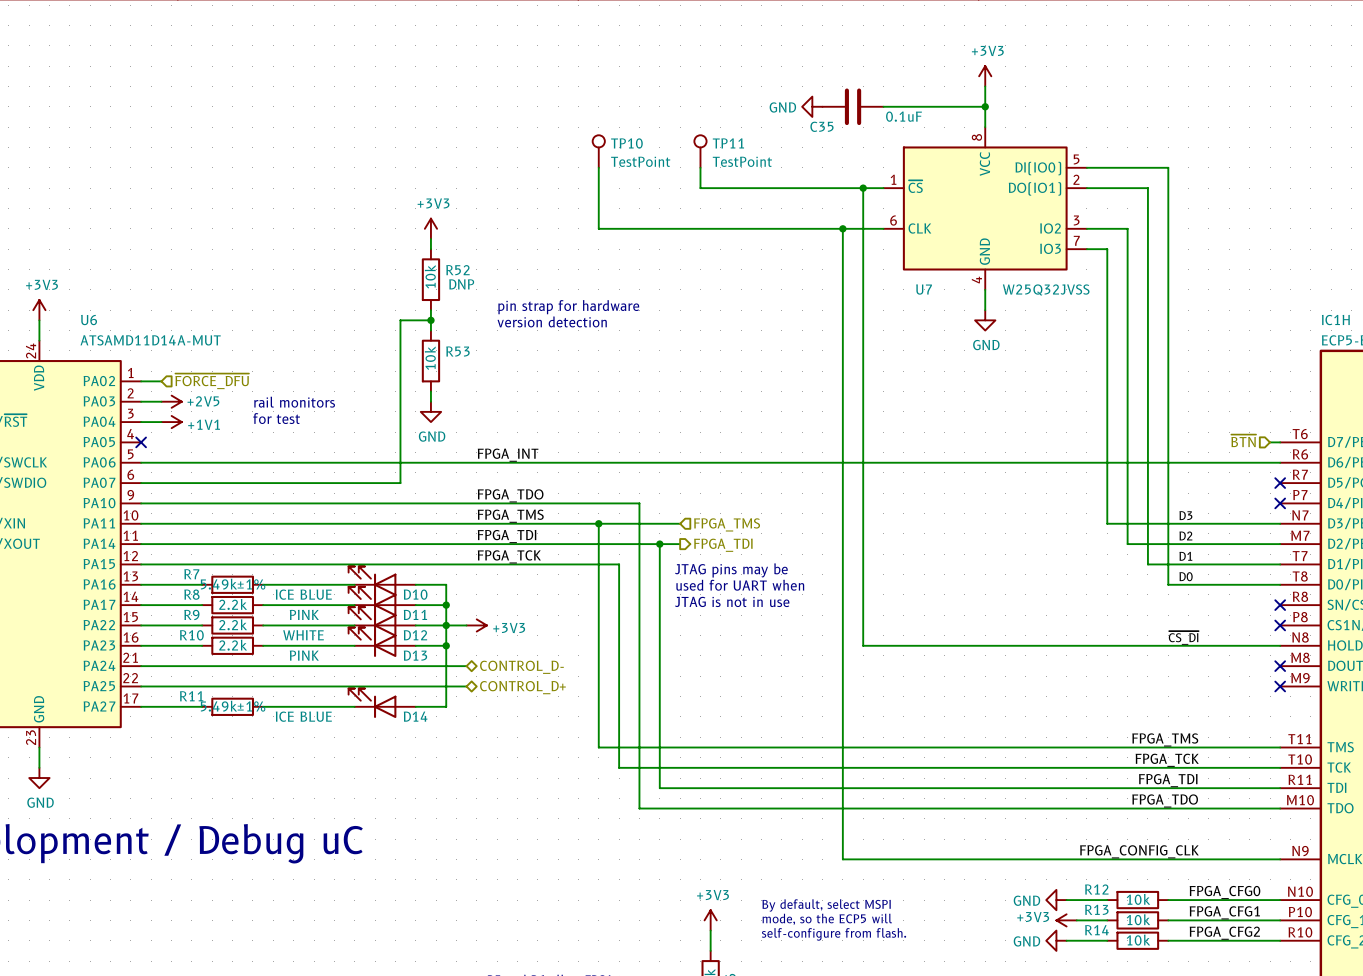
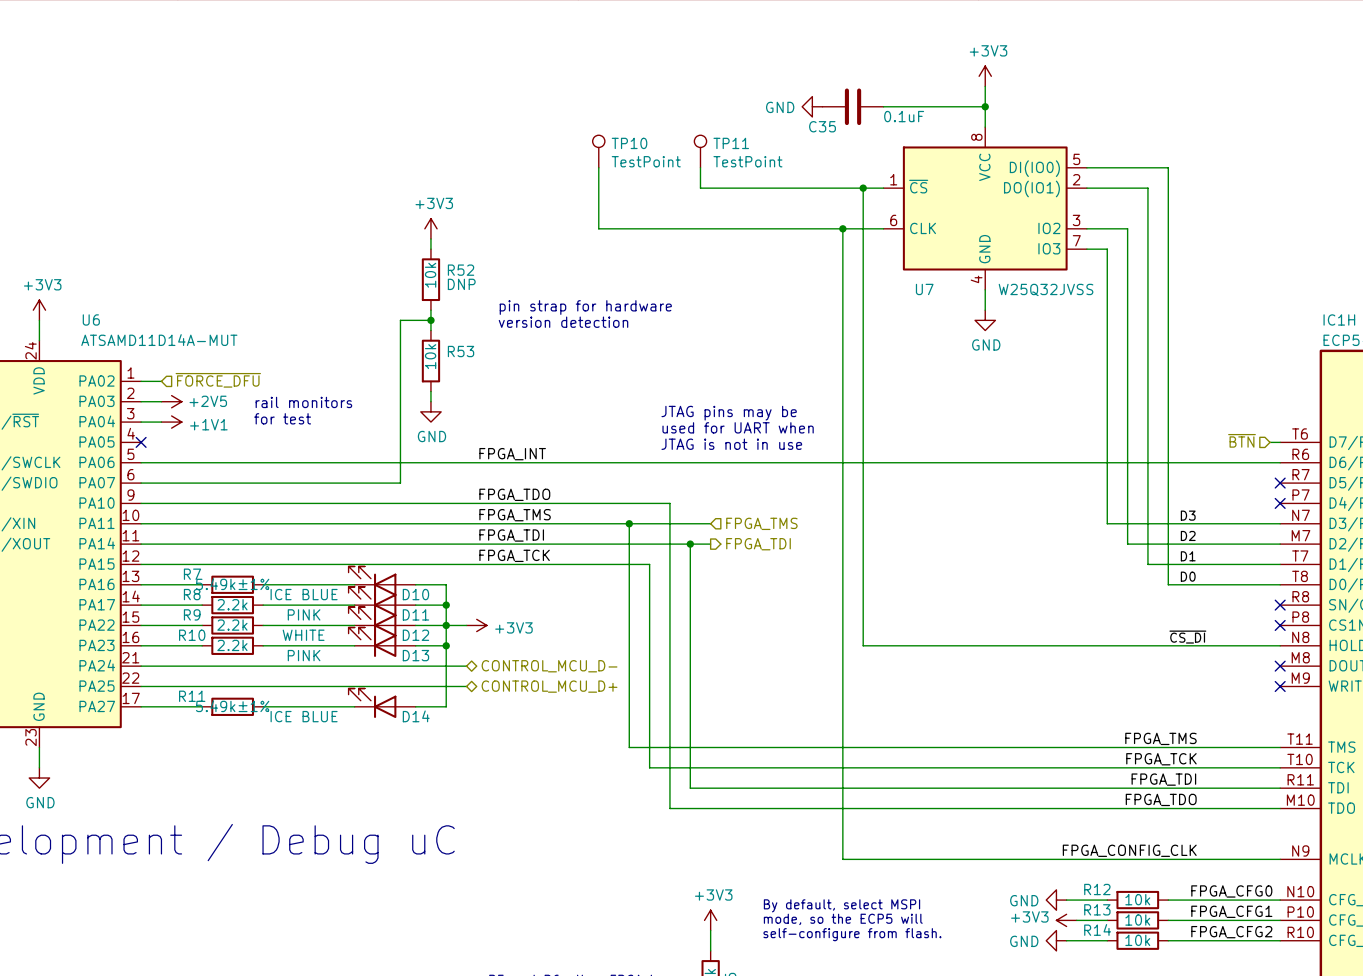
wire: (639, 503) (639, 808) (669, 808) -> (639, 503) (669, 503) (669, 808)
wire: (598, 523) (598, 747) (629, 747) -> (629, 523) (629, 747)
junction: (598, 523) -> none
junction: none -> (629, 523)
wire: none -> (680, 523) (710, 523)
hierarchical label position: FPGA_TMS (727, 524) -> FPGA_TMS (761, 523)
wire: (659, 544) (659, 788) (690, 788) -> (690, 544) (690, 788)
junction: (659, 544) -> none
wire: none -> (680, 544) (710, 544)
junction: none -> (690, 544)
hierarchical label position: FPGA_TDI (723, 545) -> FPGA_TDI (758, 544)
wire: (619, 564) (619, 767) (649, 767) -> (619, 564) (649, 564) (649, 767)
text position: JTAG pins may be (731, 570) -> JTAG pins may be (729, 413)
text position: used for UART when (740, 585) -> used for UART when (738, 427)
text position: JTAG is not in use (732, 601) -> JTAG is not in use (731, 444)
hierarchical label: CONTROL_D- (521, 667) -> CONTROL_MCU_D- (549, 666)
hierarchical label: CONTROL_D+ (522, 687) -> CONTROL_MCU_D+ (549, 686)

